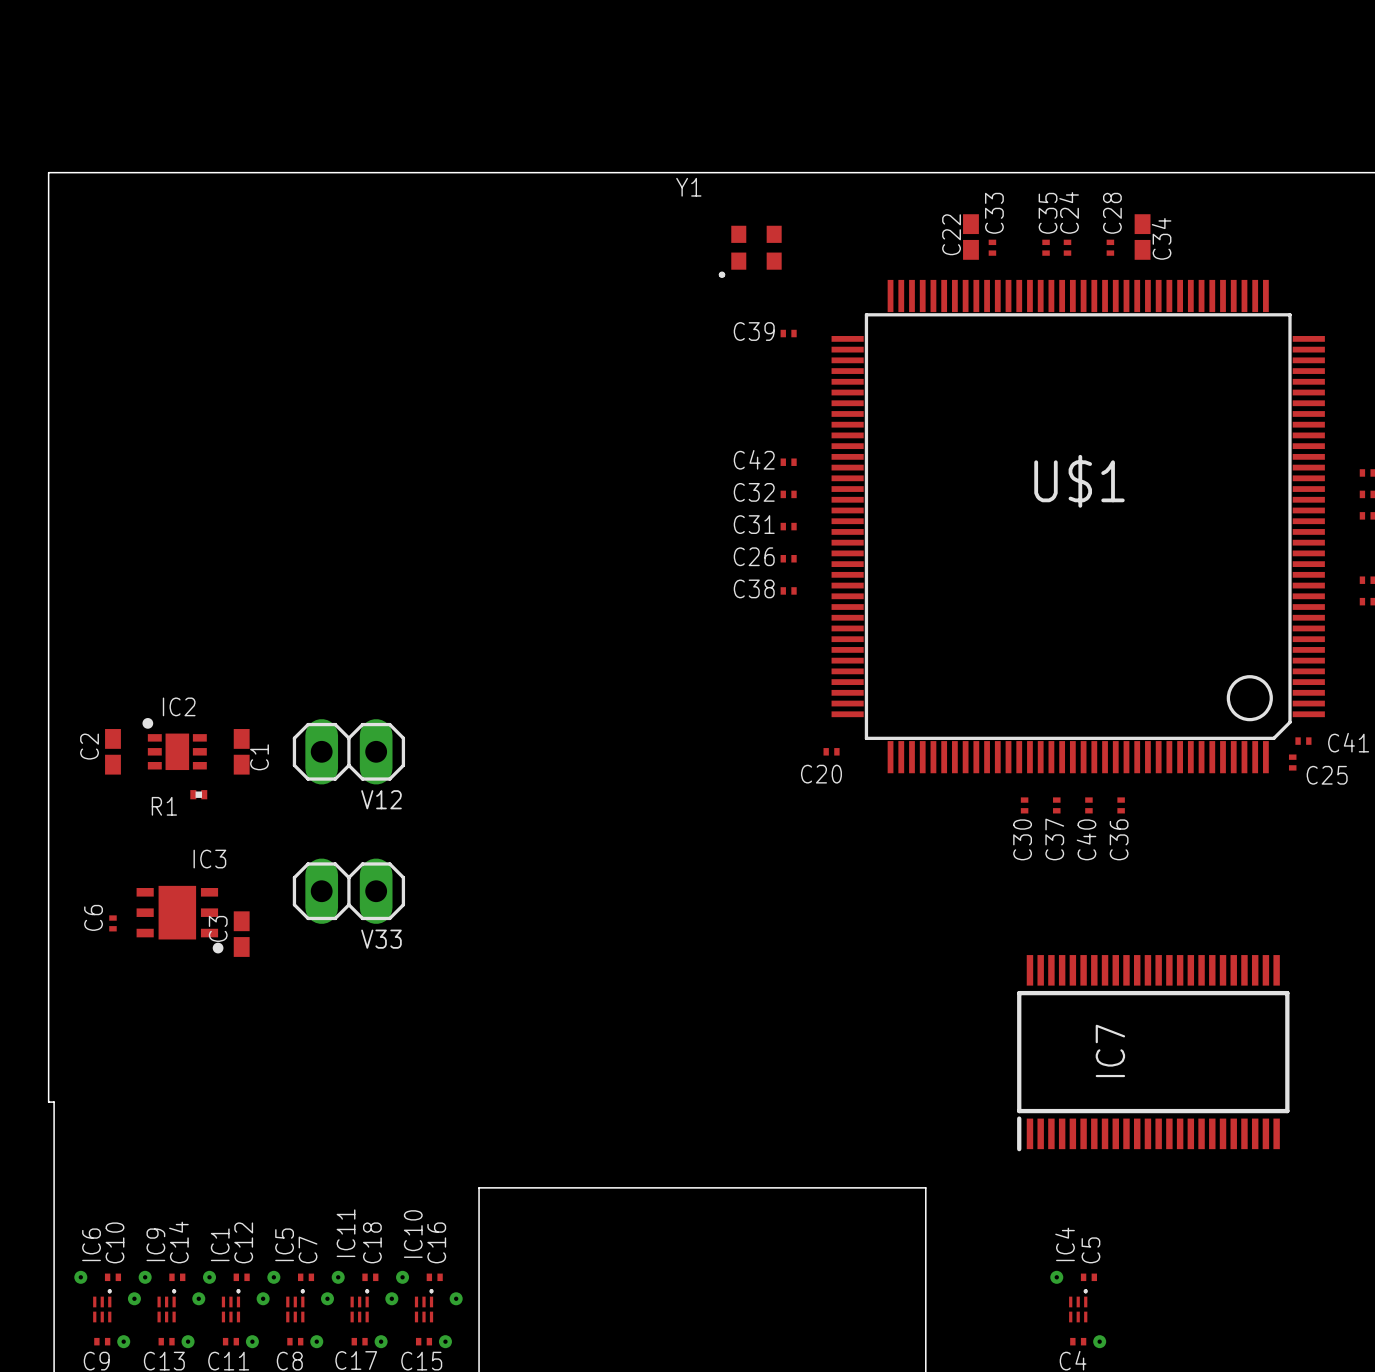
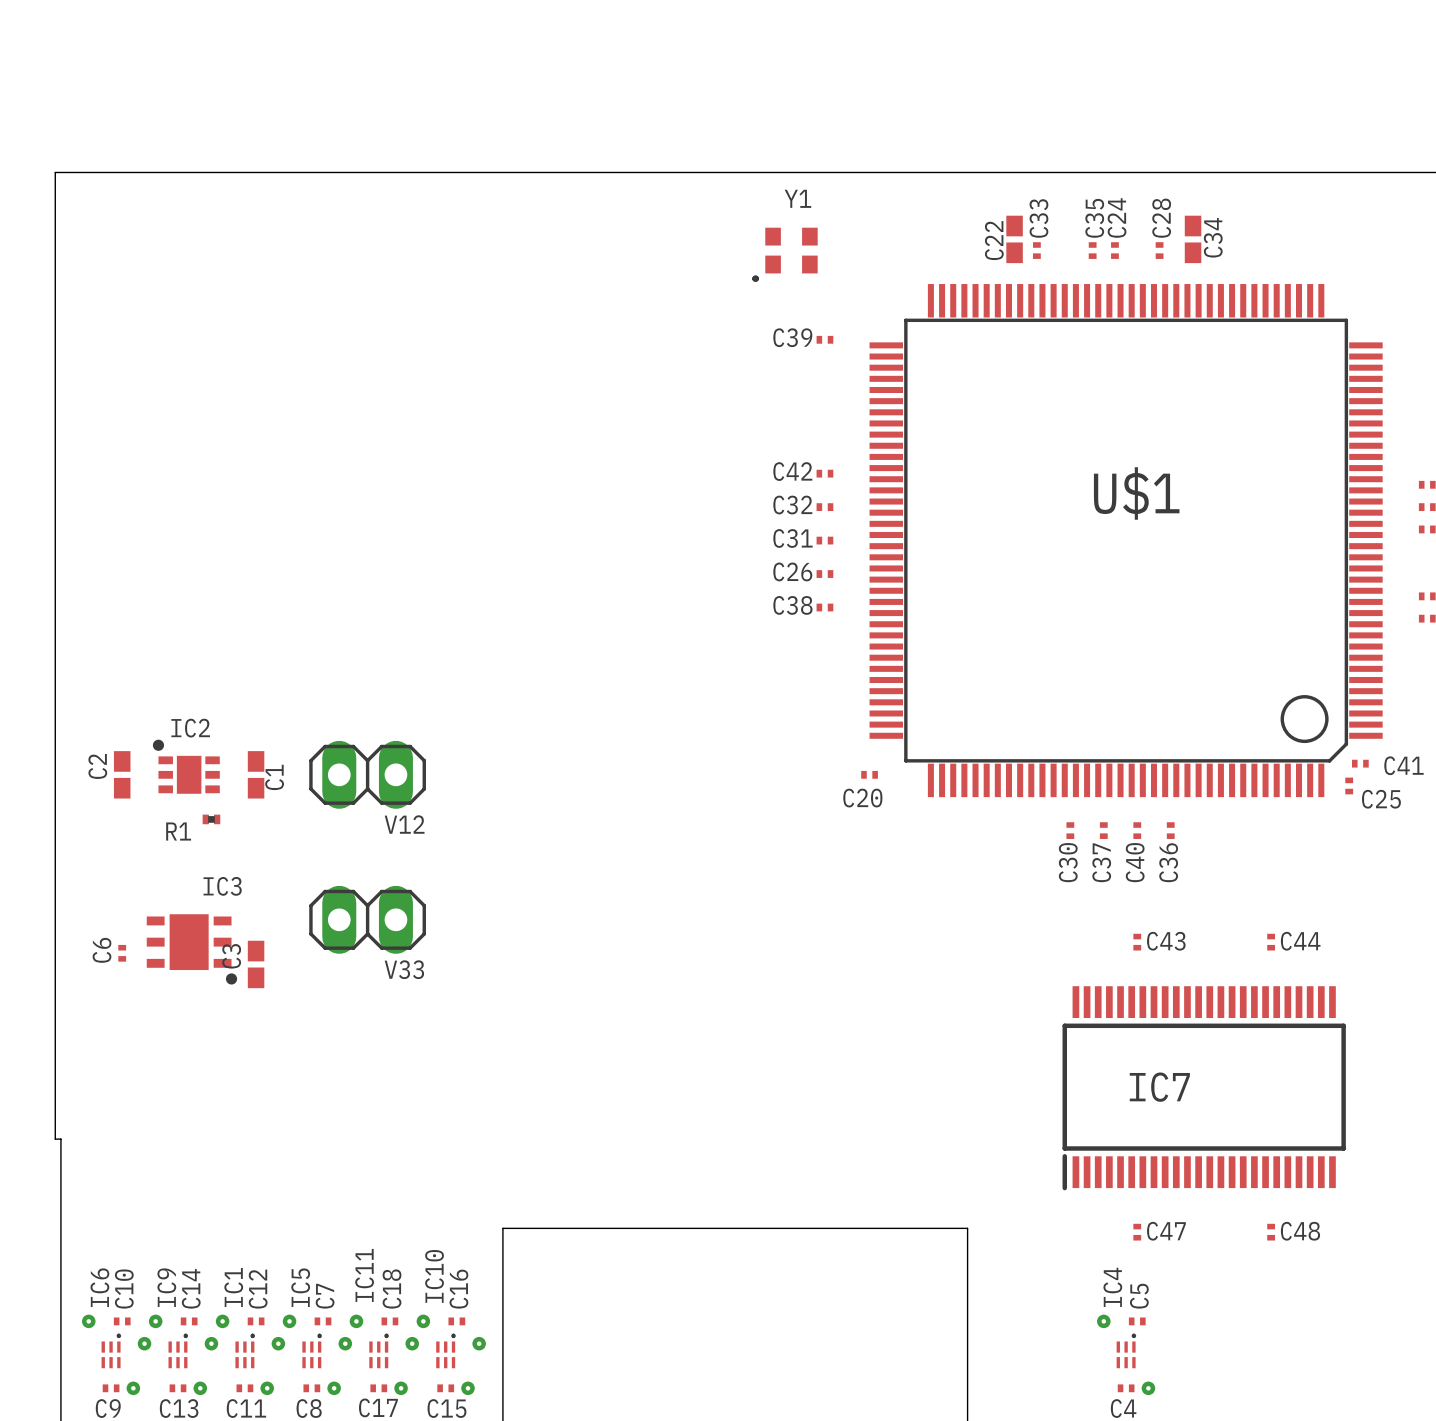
Y1 name position: Y1 (688, 187) -> Y1 (797, 198)
C43: none -> (1137, 942)
C44: none -> (1271, 942)
IC7 name rotation: 0° (1110, 1050) -> 90° clockwise (1159, 1087)
C47: none -> (1137, 1232)
C48: none -> (1271, 1232)

